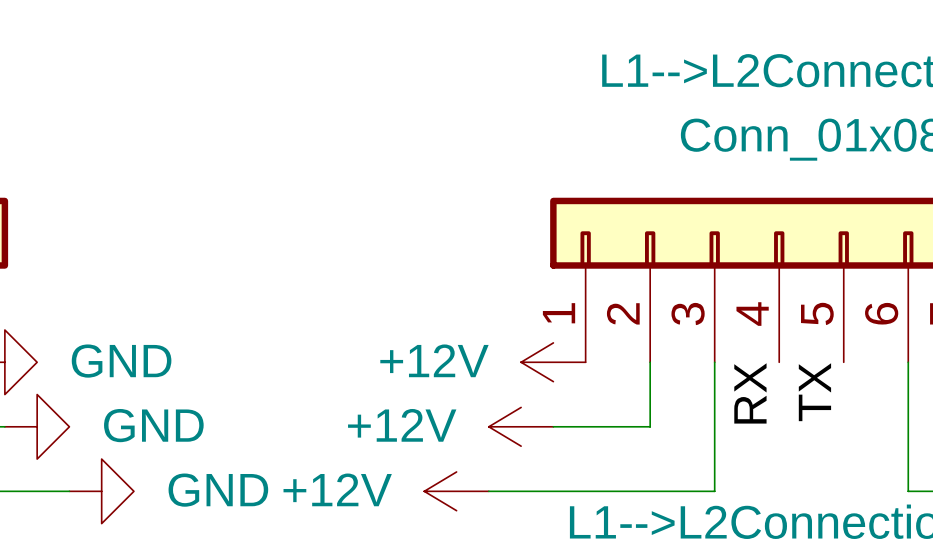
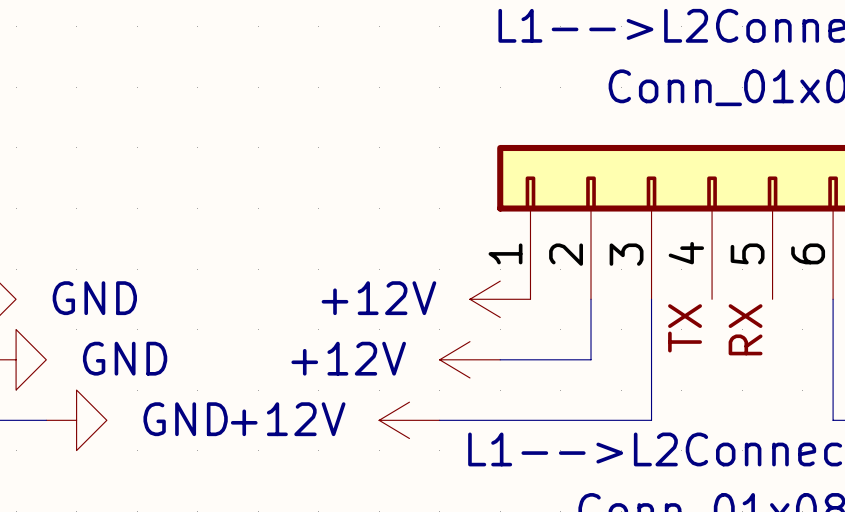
label: TX (814, 392) -> RX (745, 329)
label: RX (750, 393) -> TX (685, 328)

